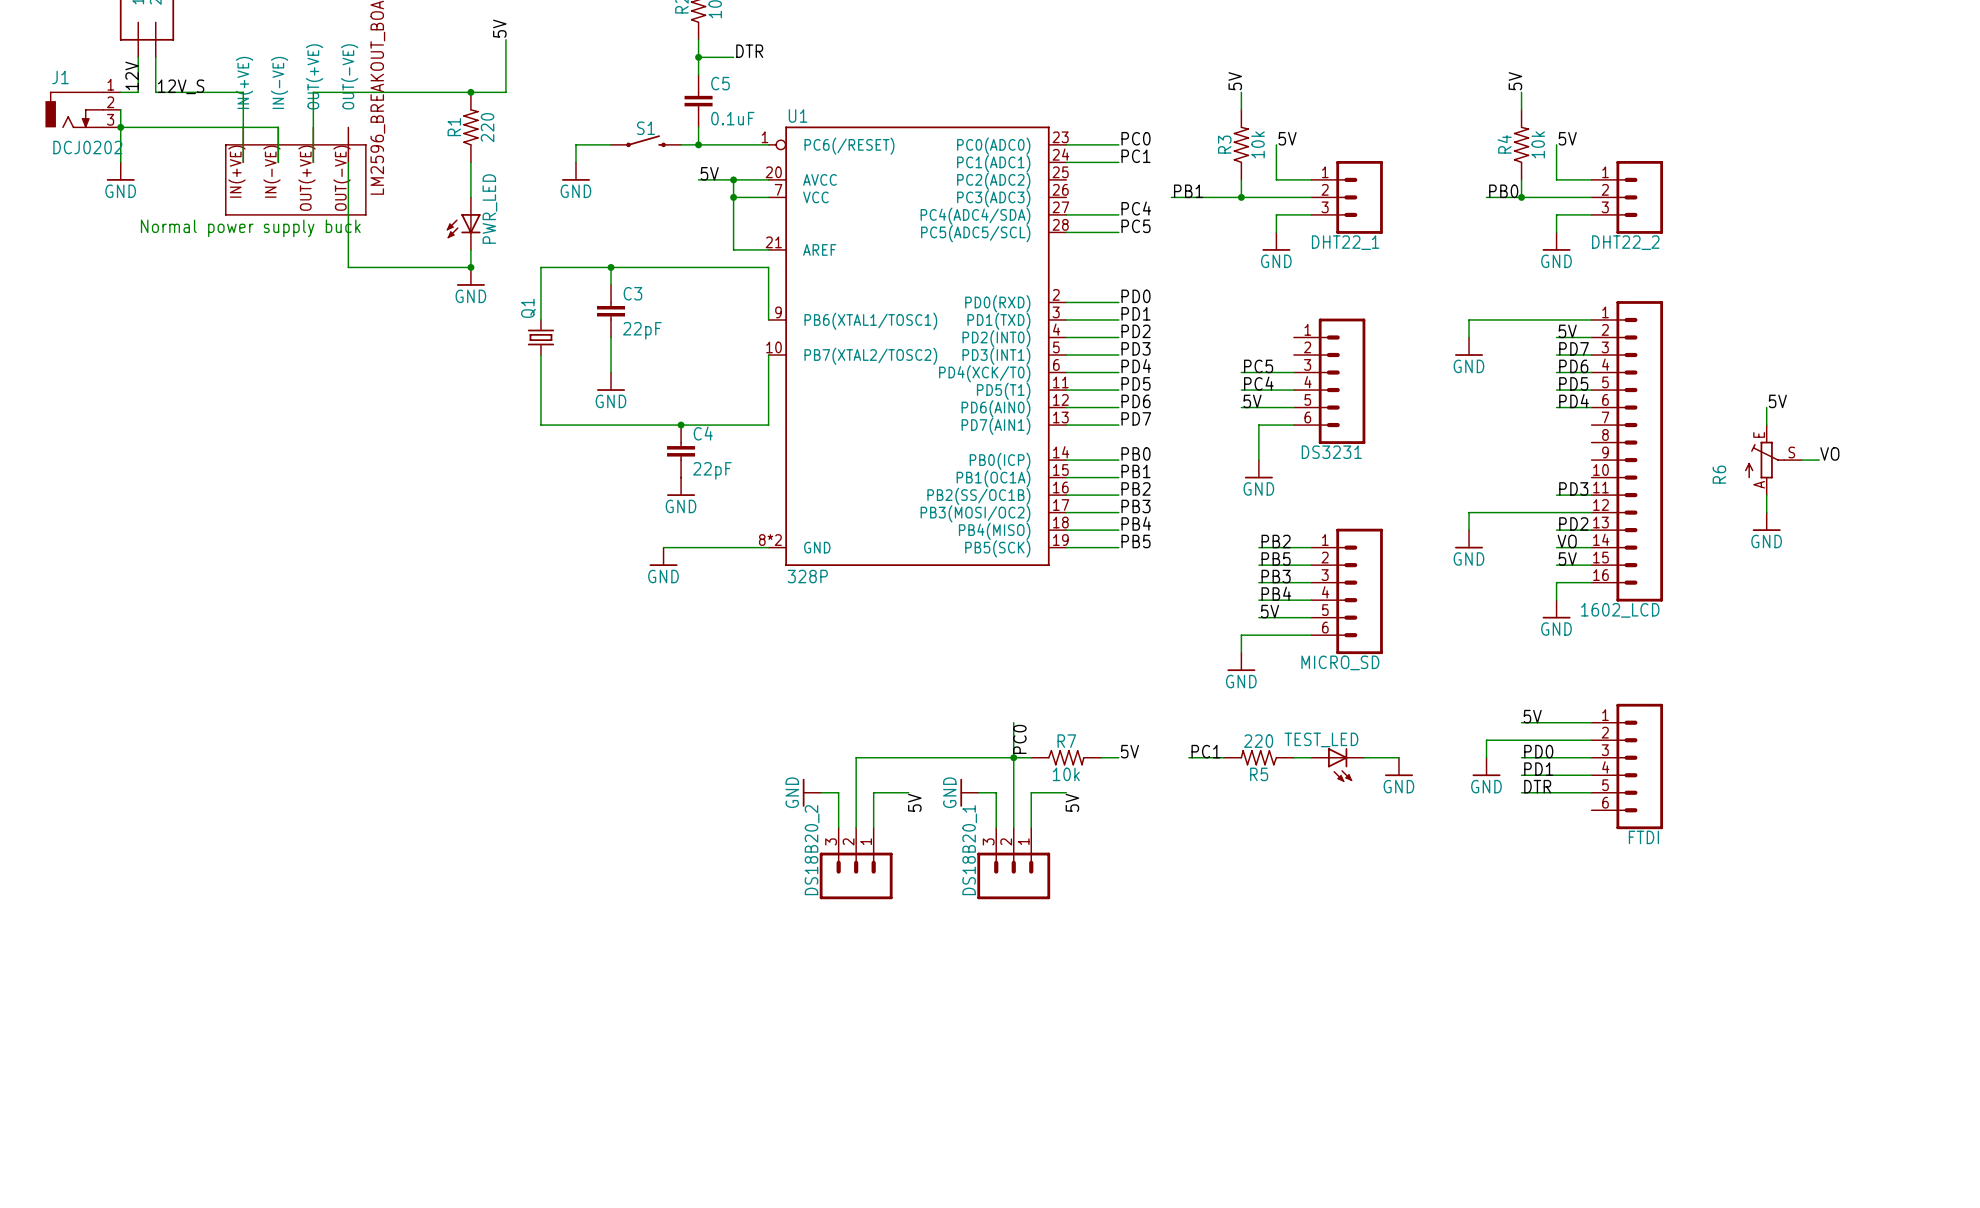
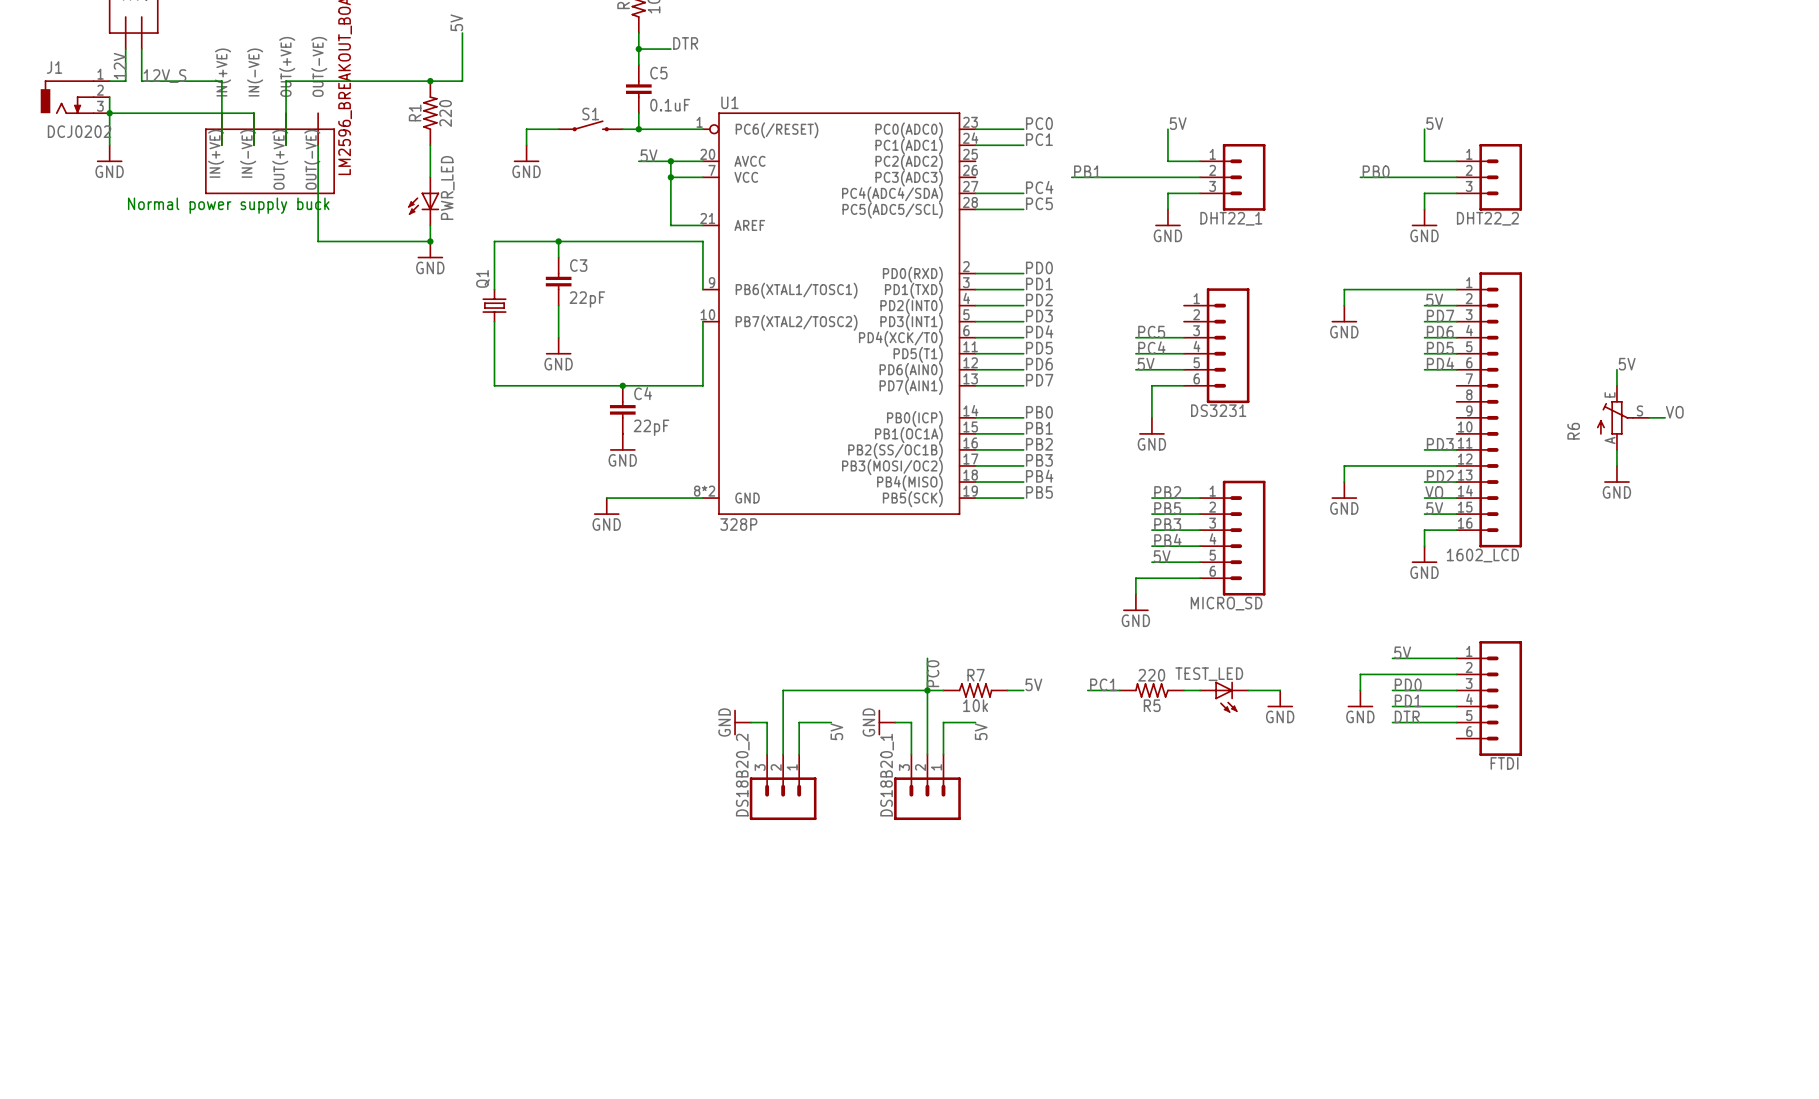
label: 5V (1235, 81) -> none
label: 5V (1515, 81) -> none
wire: (1241, 92) (1241, 109) -> none
wire: (1521, 92) (1521, 109) -> none
R3: 10k (1241, 144) -> none
R4: 10k (1521, 144) -> none
wire: (1241, 179) (1241, 197) -> none
wire: (1521, 179) (1521, 197) -> none
junction: (1241, 197) -> none
junction: (1521, 197) -> none

